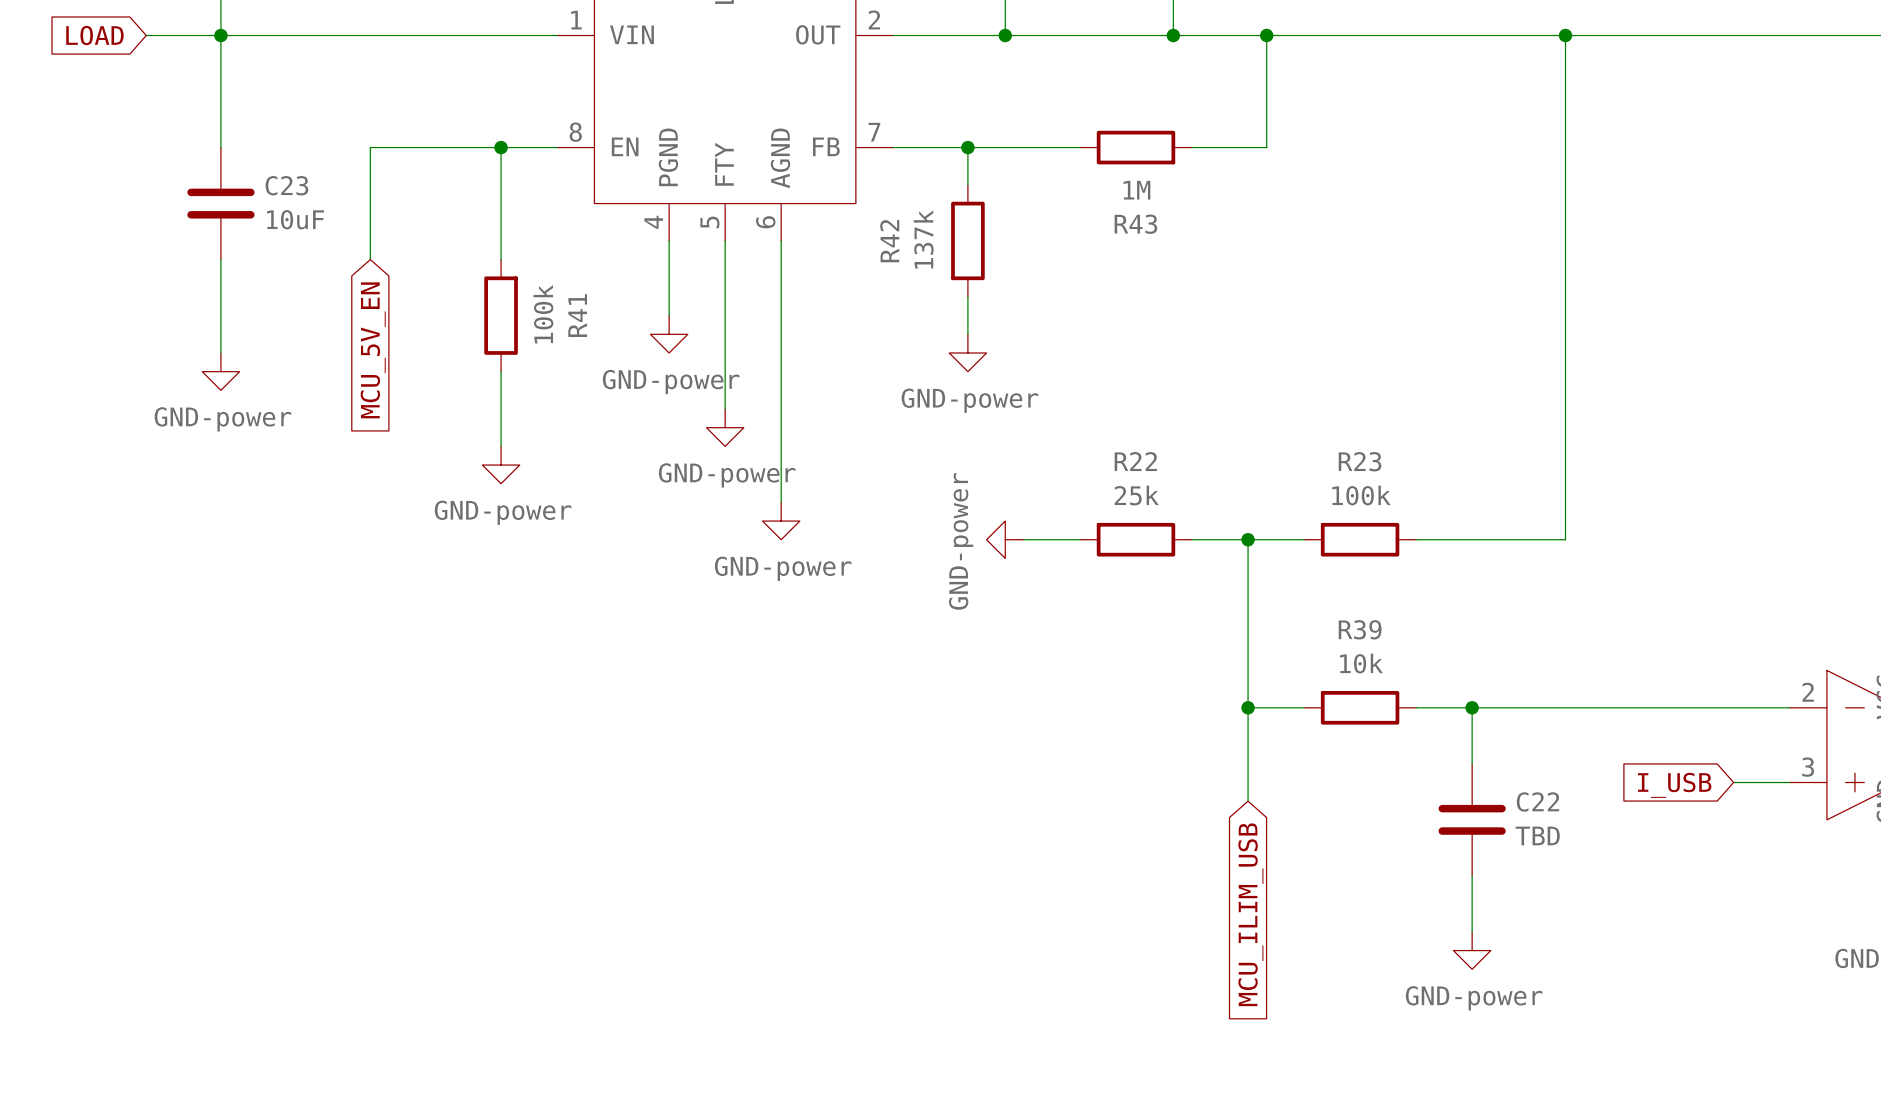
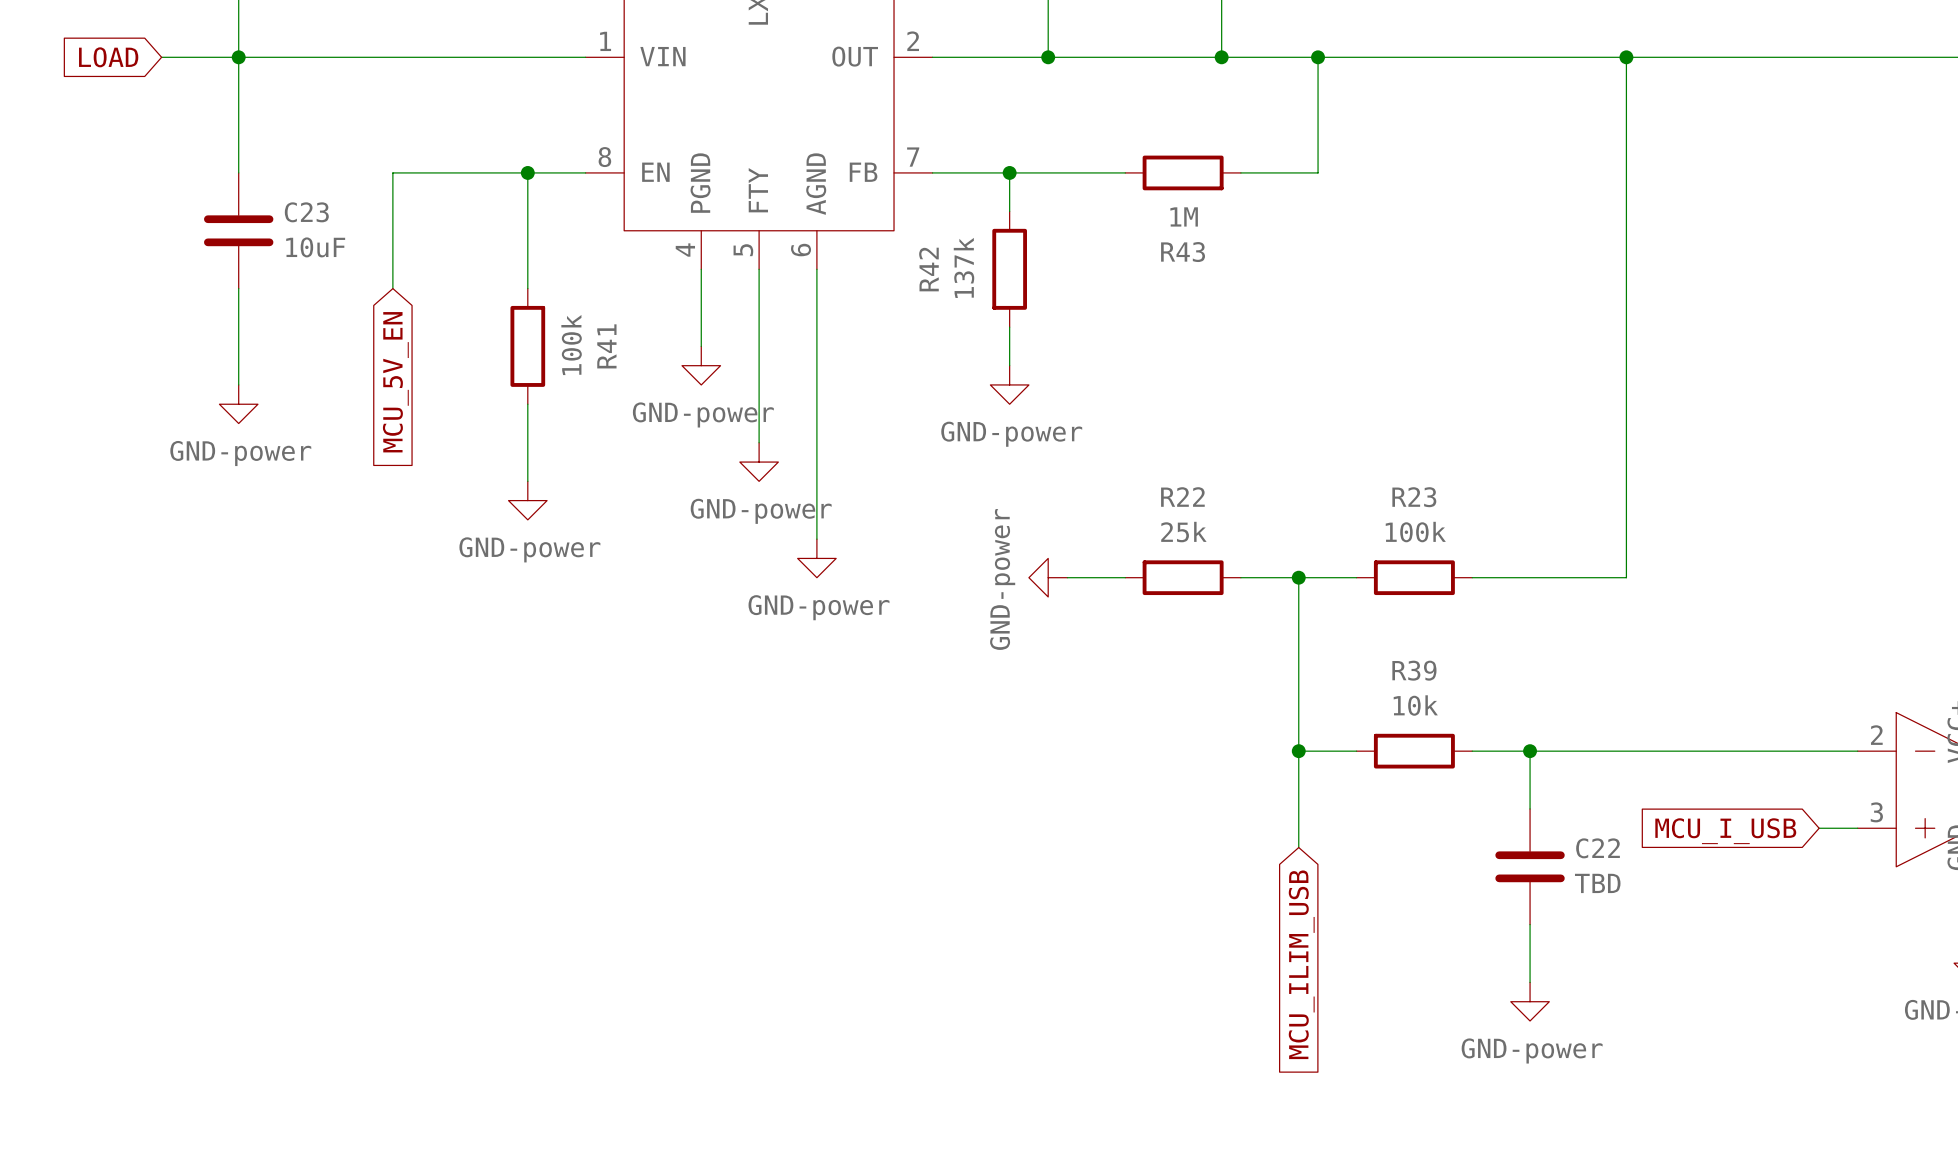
wire: (1733, 782) (1752, 782) -> none
global label: I_USB (1674, 785) -> MCU_I_USB (1725, 831)

